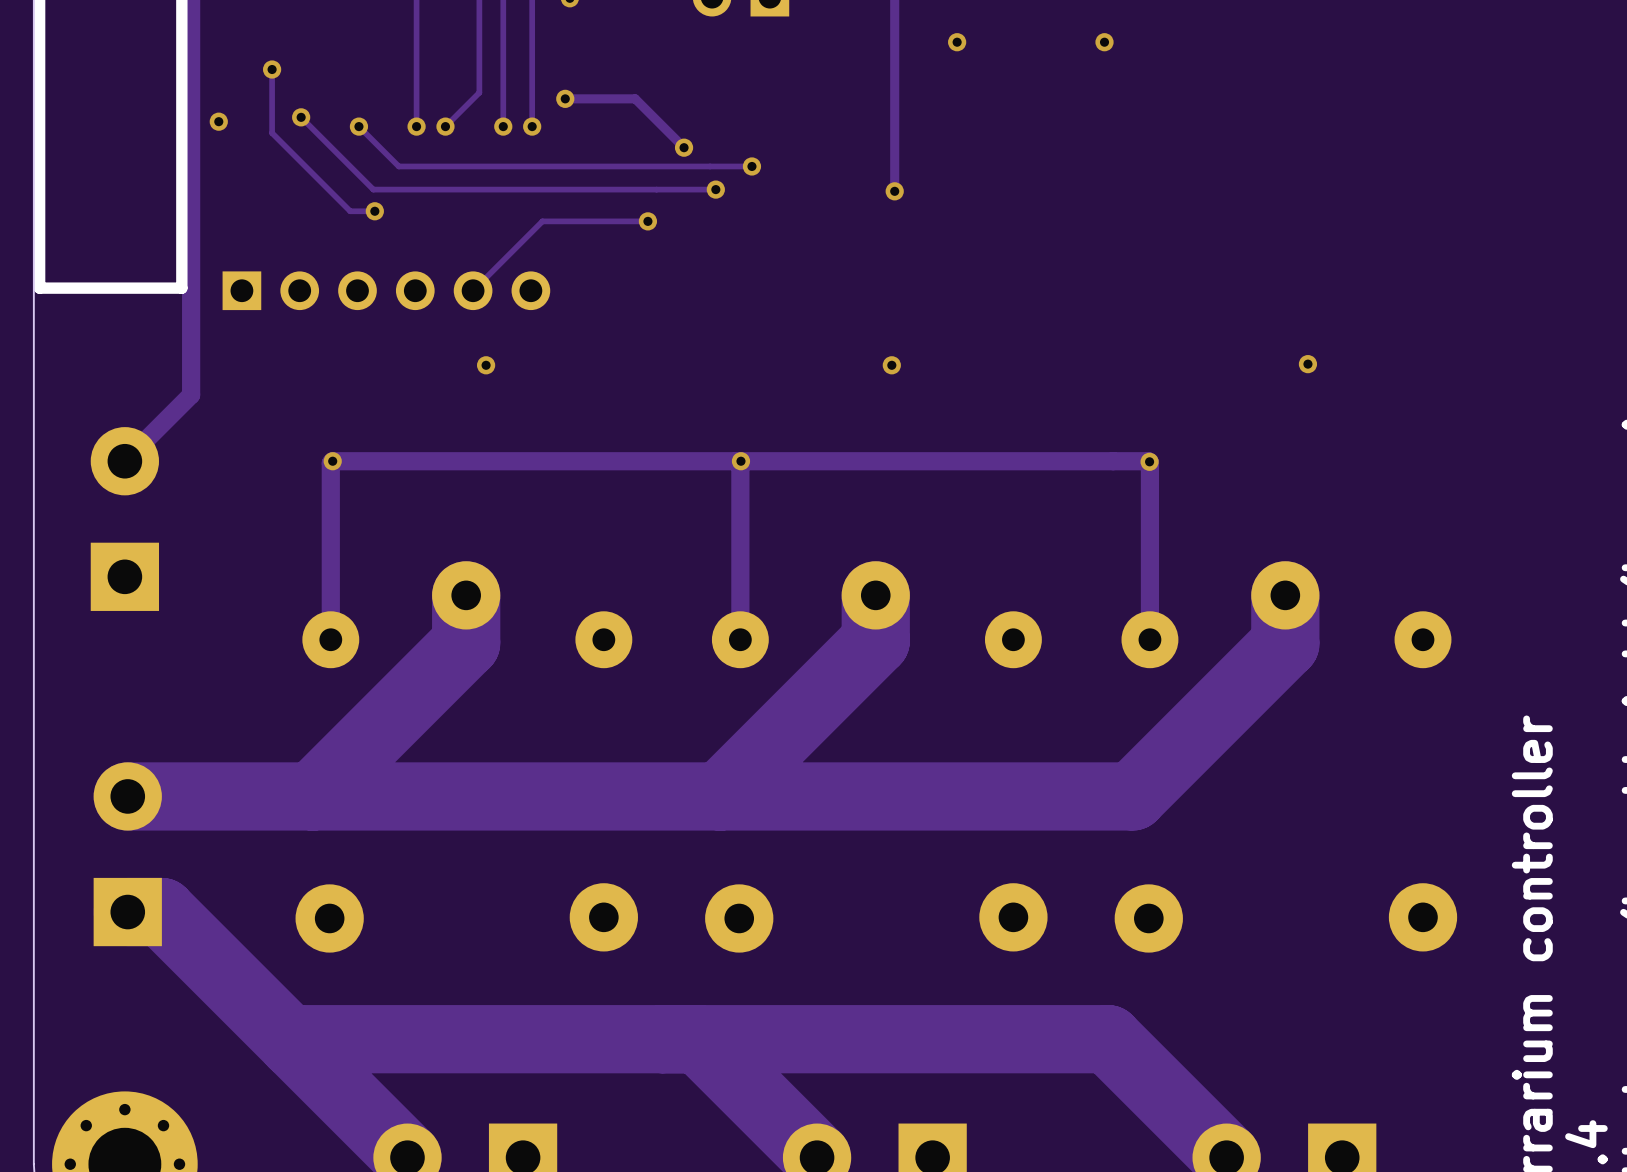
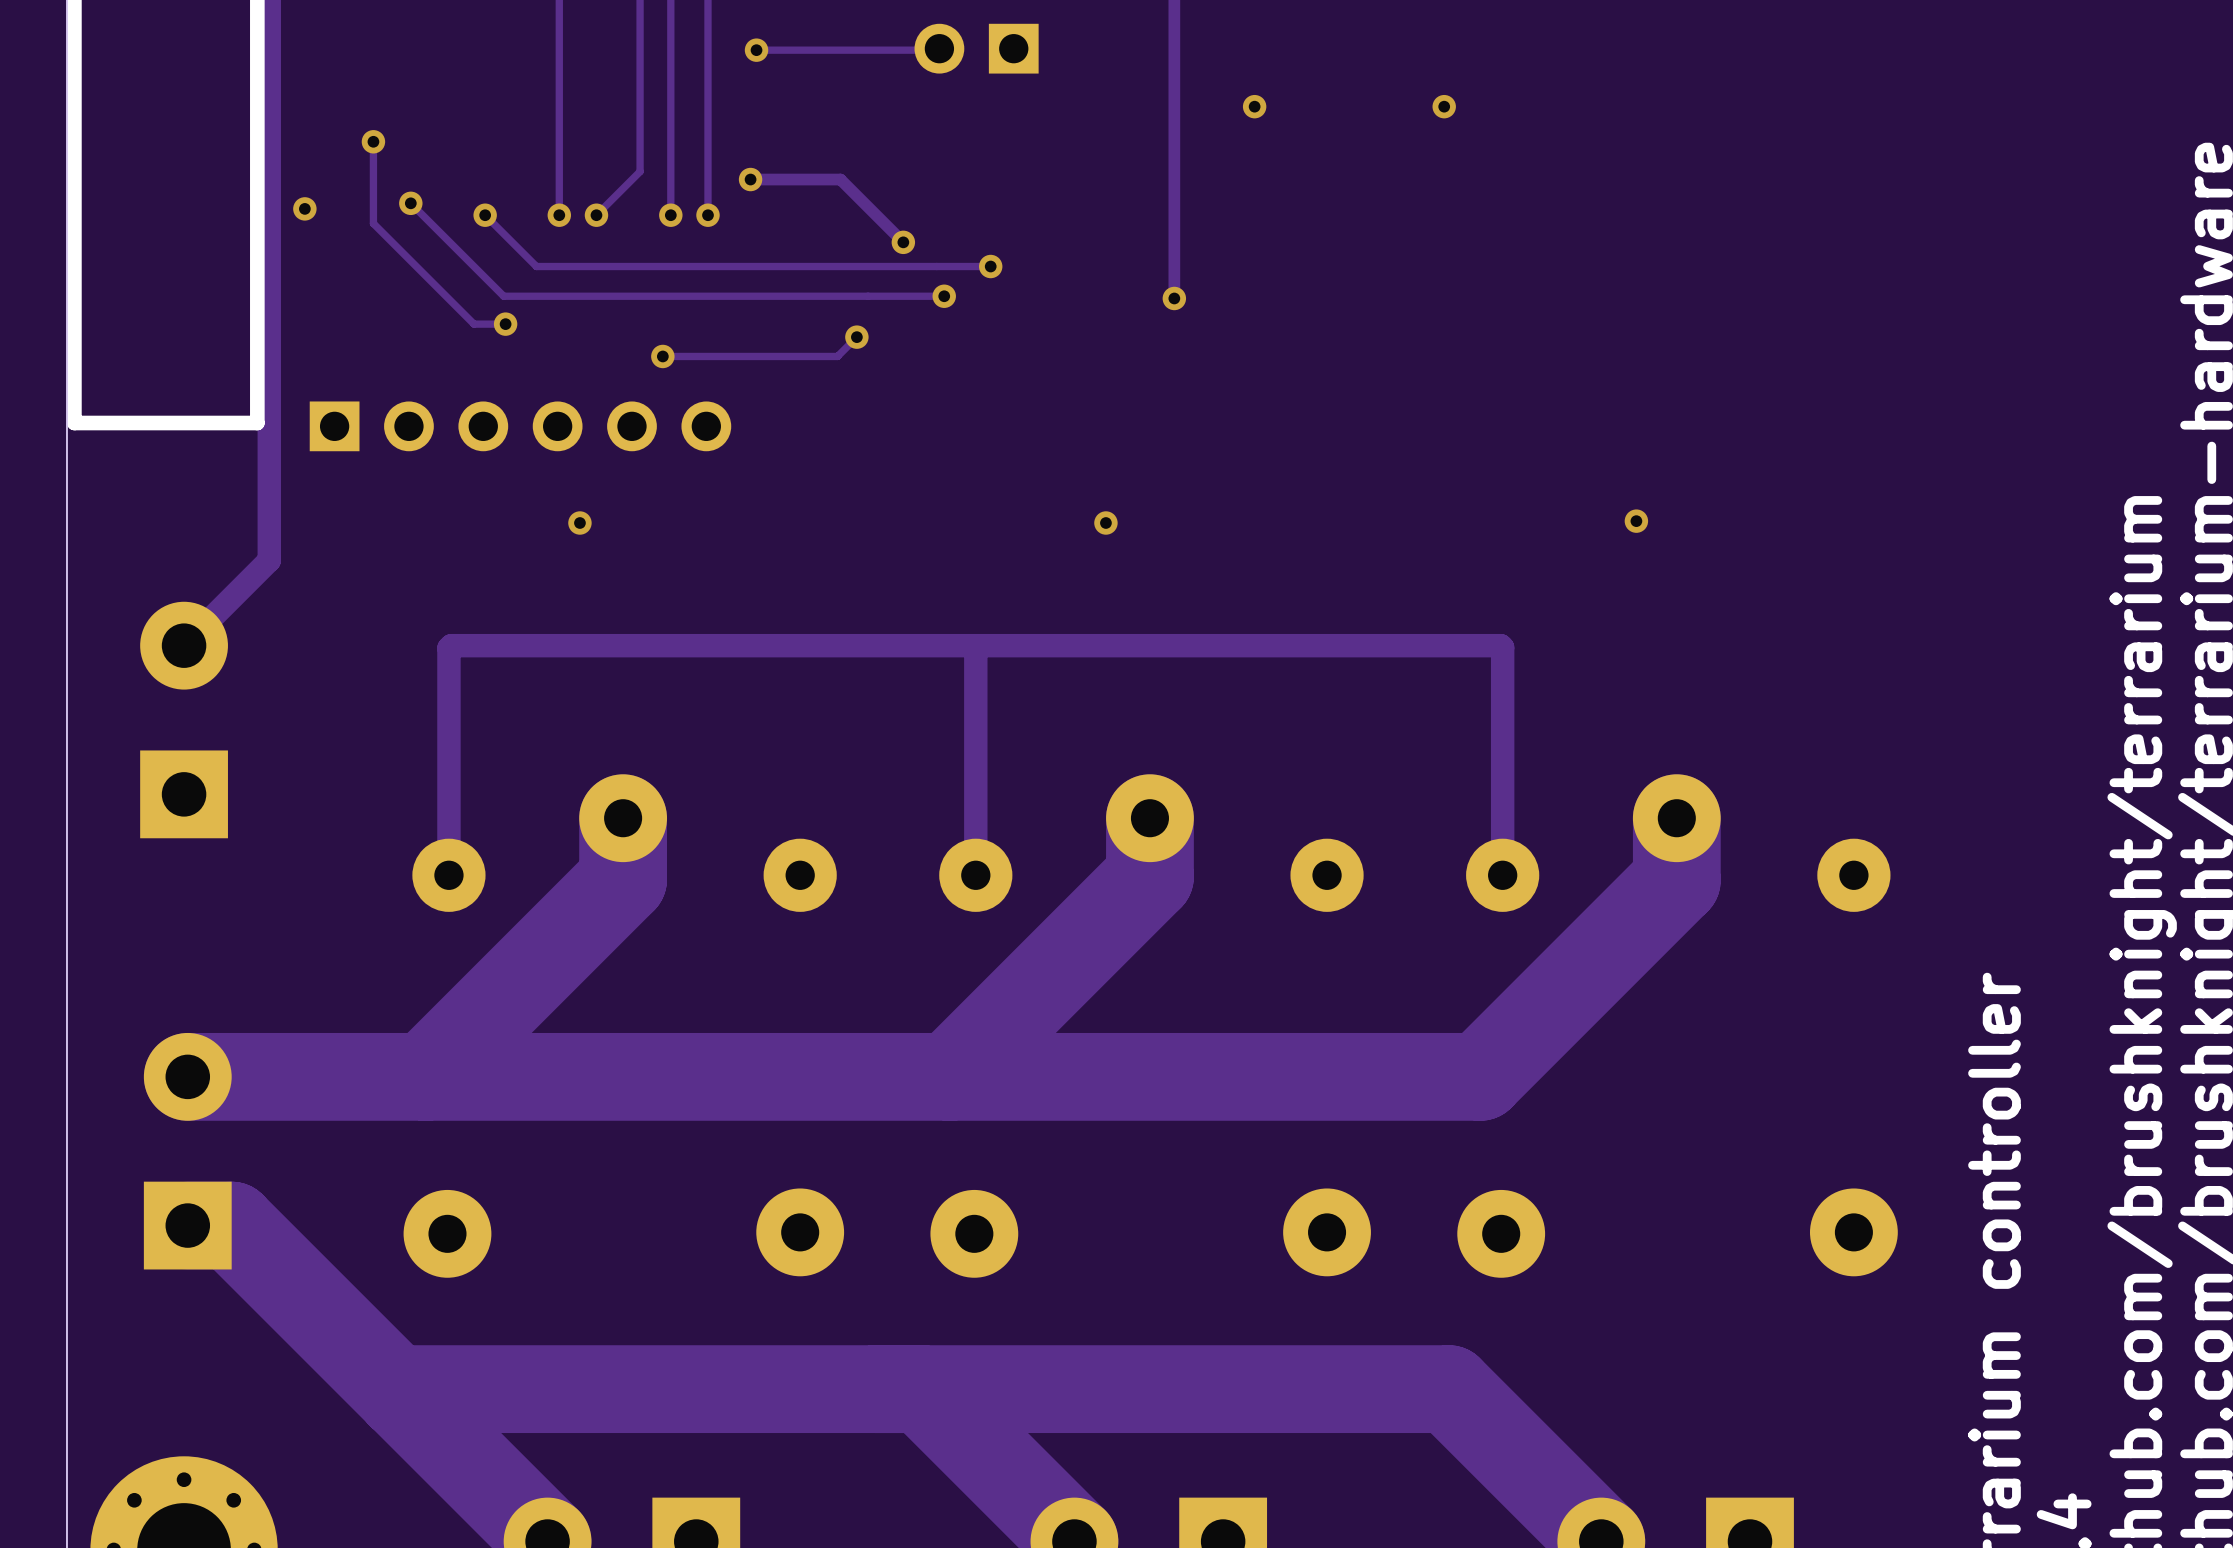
track: (647, 221) (542, 221) (473, 290) -> (856, 337) (837, 356) (662, 356)
via: none -> (662, 356)
via position: (1307, 364) -> (1636, 521)
via position: (486, 365) -> (579, 523)
via position: (891, 365) -> (1105, 523)
via: (332, 461) -> none
via: (740, 461) -> none
via: (1149, 461) -> none

